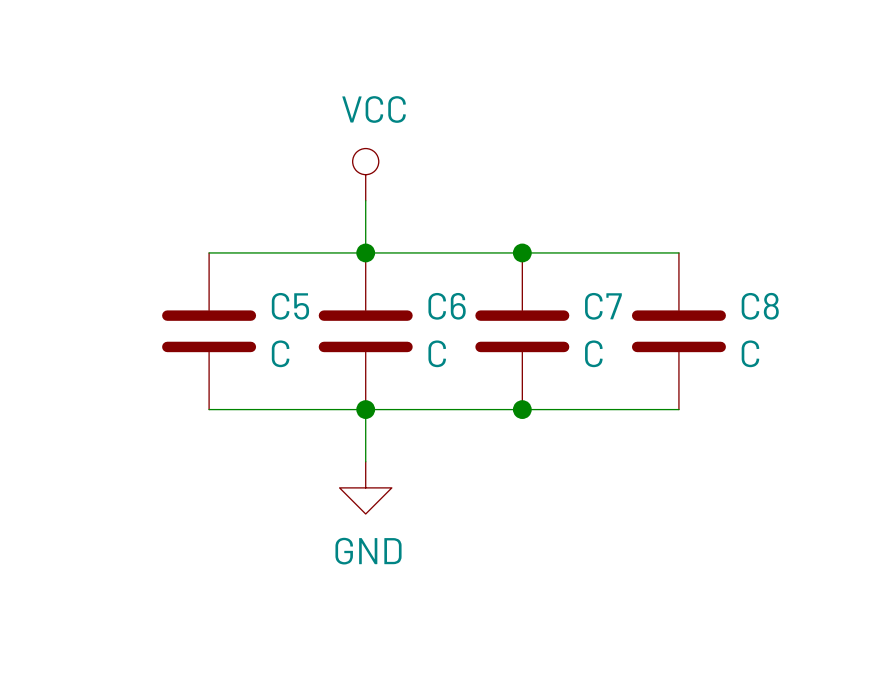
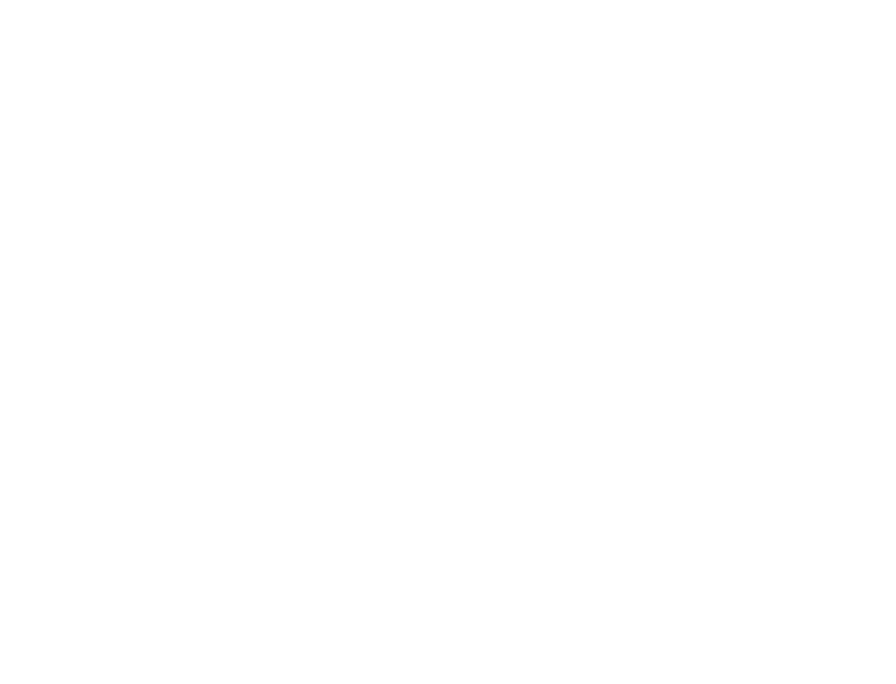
power symbol: VCC (365, 174) -> none
wire: (365, 200) (365, 252) -> none
wire: (209, 252) (678, 252) -> none
junction: (365, 252) -> none
junction: (522, 252) -> none
C5: C (209, 331) -> none
C6: C (365, 331) -> none
C7: C (522, 331) -> none
C8: C (678, 331) -> none
wire: (209, 409) (678, 409) -> none
wire: (365, 409) (365, 461) -> none
junction: (365, 409) -> none
junction: (522, 409) -> none
power symbol: GND (365, 487) -> none

